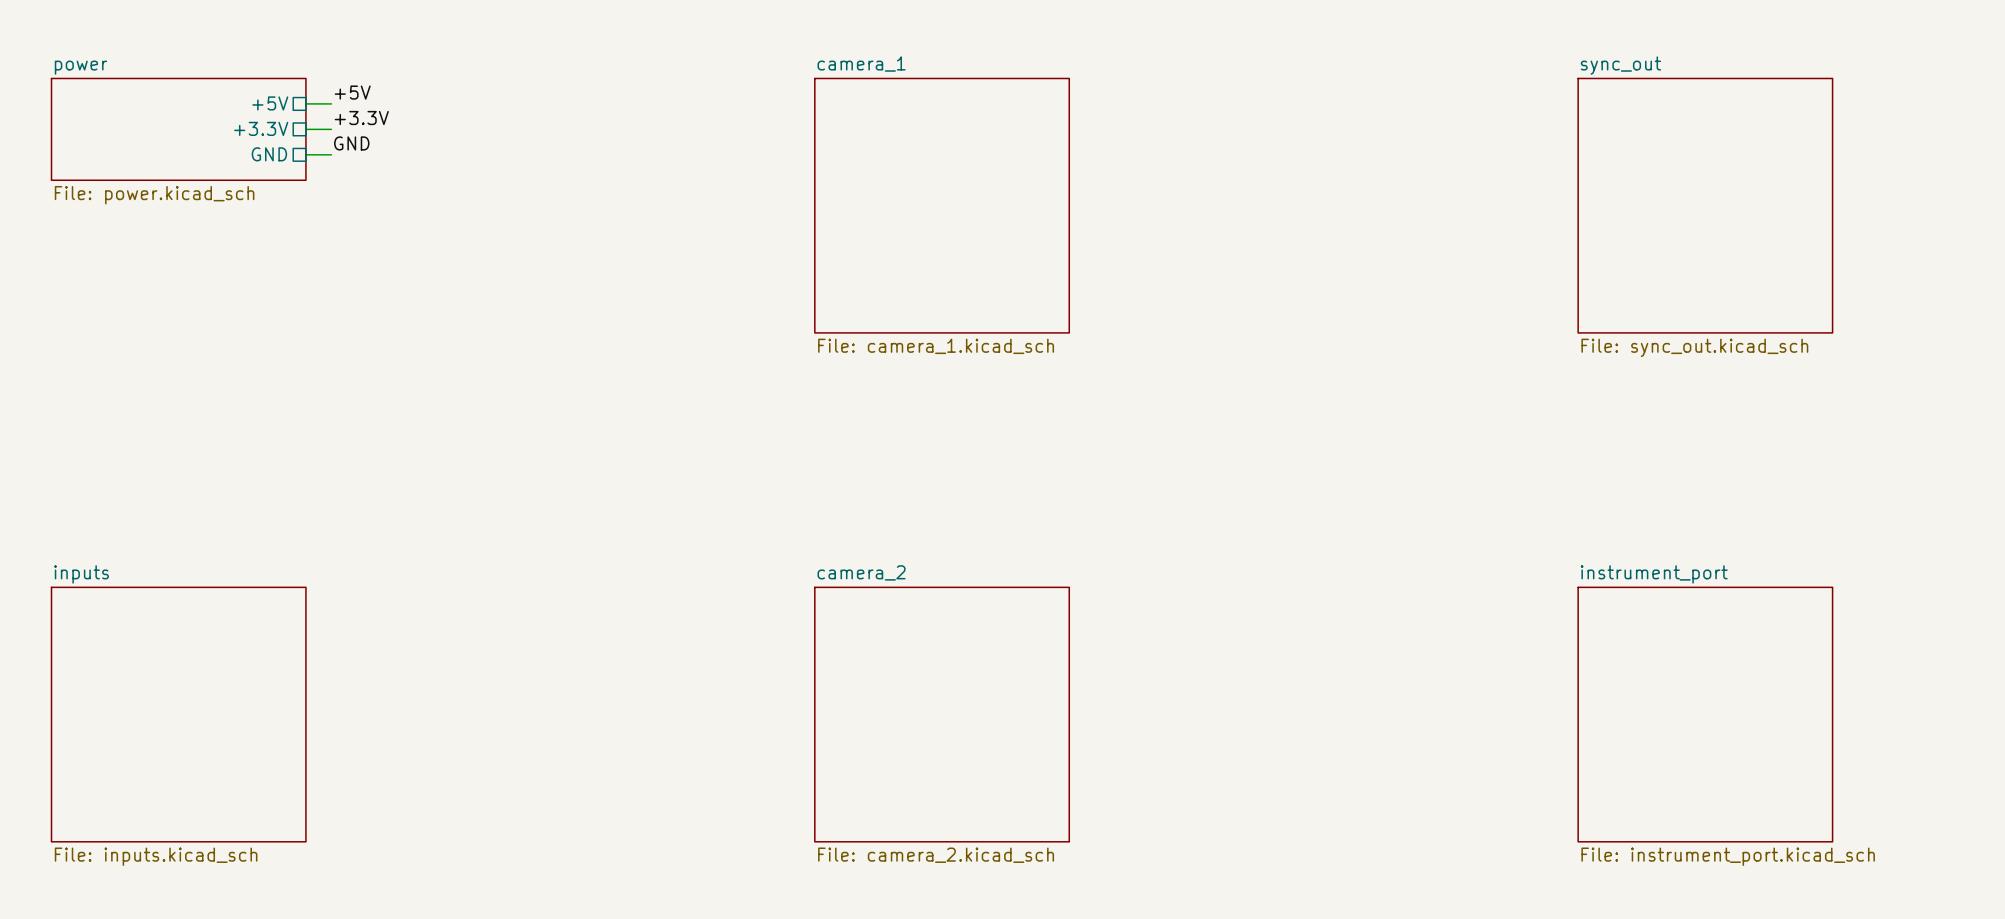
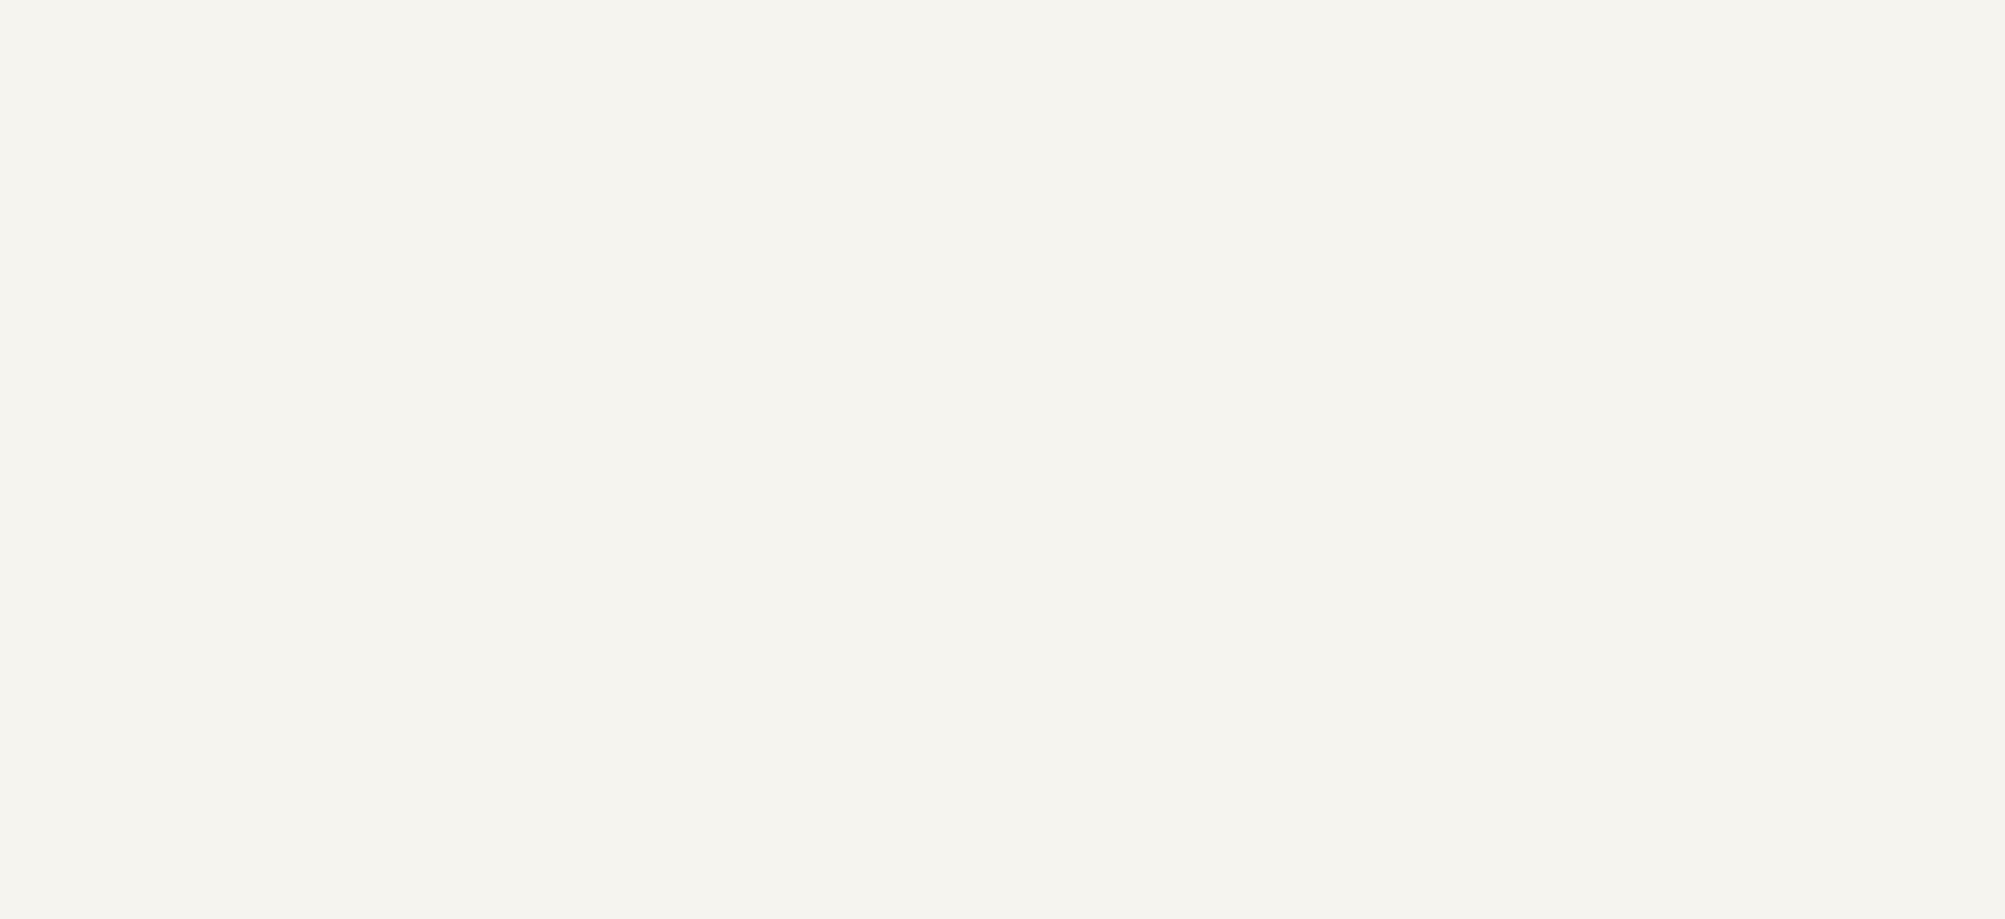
label: +5V (352, 92) -> none
sheet pin: +5V (270, 103) -> none
wire: (305, 103) (331, 103) -> none
label: +3.3V (361, 118) -> none
sheet pin: +3.3V (261, 128) -> none
sheet power: File: power.kicad_sch (178, 129) -> none
wire: (305, 129) (331, 129) -> none
label: GND (351, 143) -> none
sheet pin: GND (269, 154) -> none
wire: (305, 154) (331, 154) -> none
sheet camera_1: File: camera_1.kicad_sch (942, 205) -> none
sheet sync_out: File: sync_out.kicad_sch (1705, 205) -> none
sheet inputs: File: inputs.kicad_sch (178, 714) -> none
sheet camera_2: File: camera_2.kicad_sch (942, 714) -> none
sheet instrument_port: File: instrument_port.kicad_sch (1705, 714) -> none

